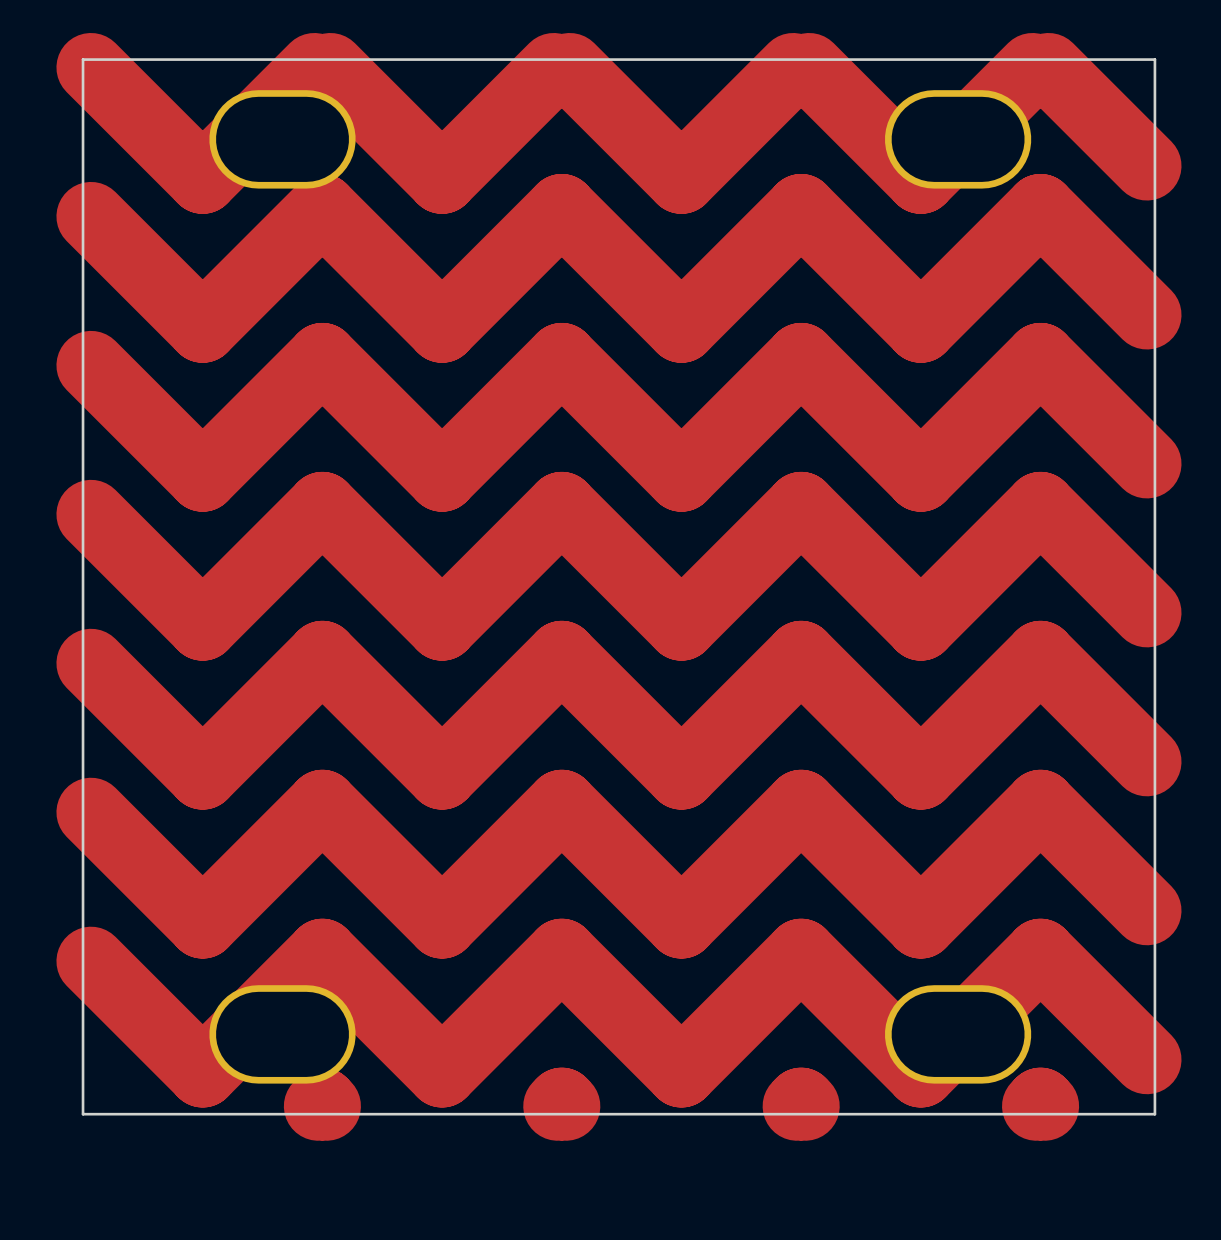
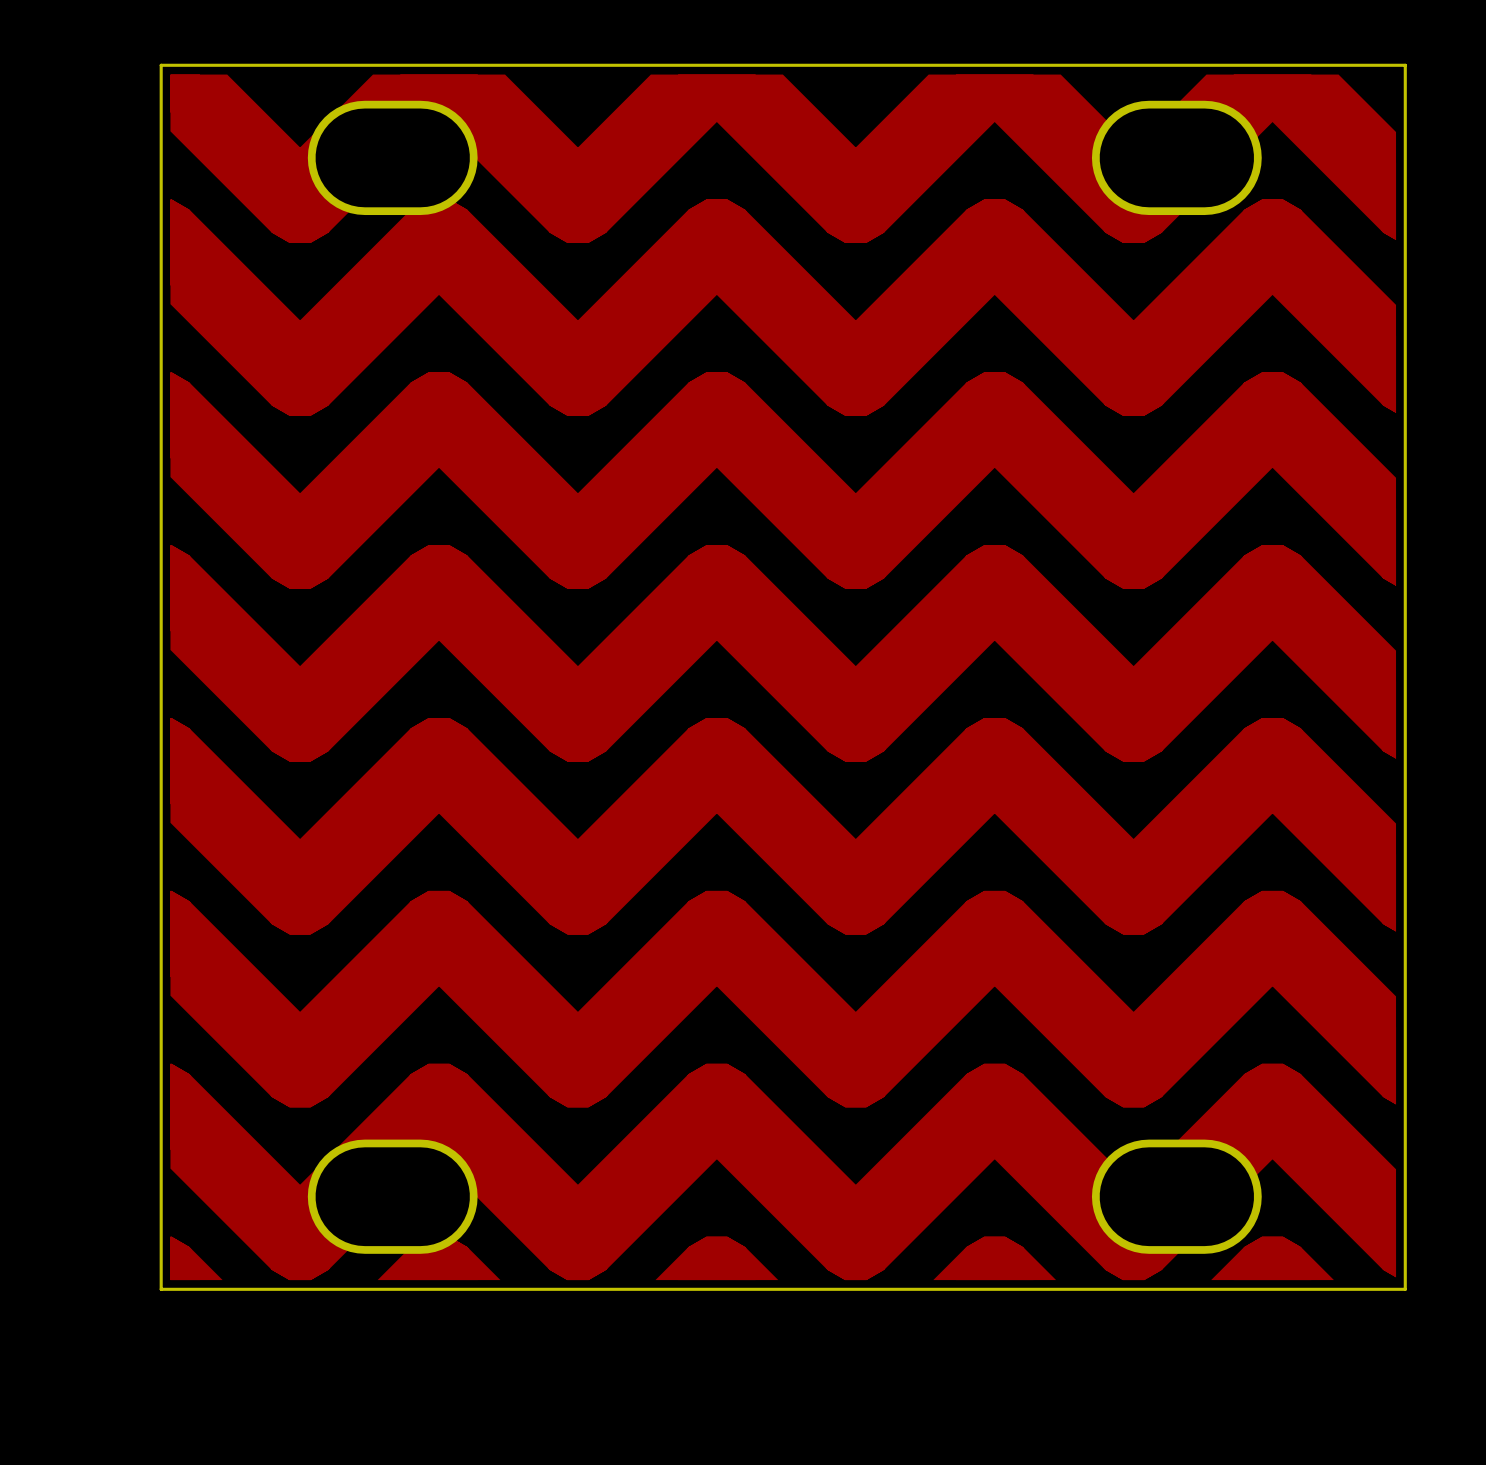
track: (91, 67) (202, 179) (314, 67) -> none
drawing: none -> [170, 74, 1397, 1281]
track: (330, 67) (442, 179) (553, 67) -> none
track: (569, 67) (681, 179) (793, 67) -> none
track: (809, 67) (920, 179) (1032, 67) -> none
track: (1048, 67) (1146, 165) -> none
track: (91, 216) (202, 328) (322, 208) (442, 328) (561, 208) (681, 328) (801, 208) (920, 328) (1040, 208) (1146, 314) -> none
track: (91, 365) (202, 477) (322, 357) (442, 477) (561, 357) (681, 477) (801, 357) (920, 477) (1040, 357) (1146, 463) -> none
track: (91, 514) (202, 626) (322, 506) (442, 626) (561, 506) (681, 626) (801, 506) (920, 626) (1040, 506) (1146, 612) -> none
track: (91, 663) (202, 775) (322, 655) (442, 775) (561, 655) (681, 775) (801, 655) (920, 775) (1040, 655) (1146, 761) -> none
track: (91, 812) (202, 924) (322, 804) (442, 924) (561, 804) (681, 924) (801, 804) (920, 924) (1040, 804) (1146, 910) -> none
track: (91, 961) (202, 1072) (322, 953) (442, 1072) (561, 953) (681, 1072) (801, 953) (920, 1072) (1040, 953) (1146, 1059) -> none
track: (318, 1106) (322, 1102) (326, 1106) -> none
track: (557, 1106) (561, 1102) (565, 1106) -> none
track: (797, 1106) (801, 1102) (805, 1106) -> none
track: (1036, 1106) (1040, 1102) (1044, 1106) -> none

